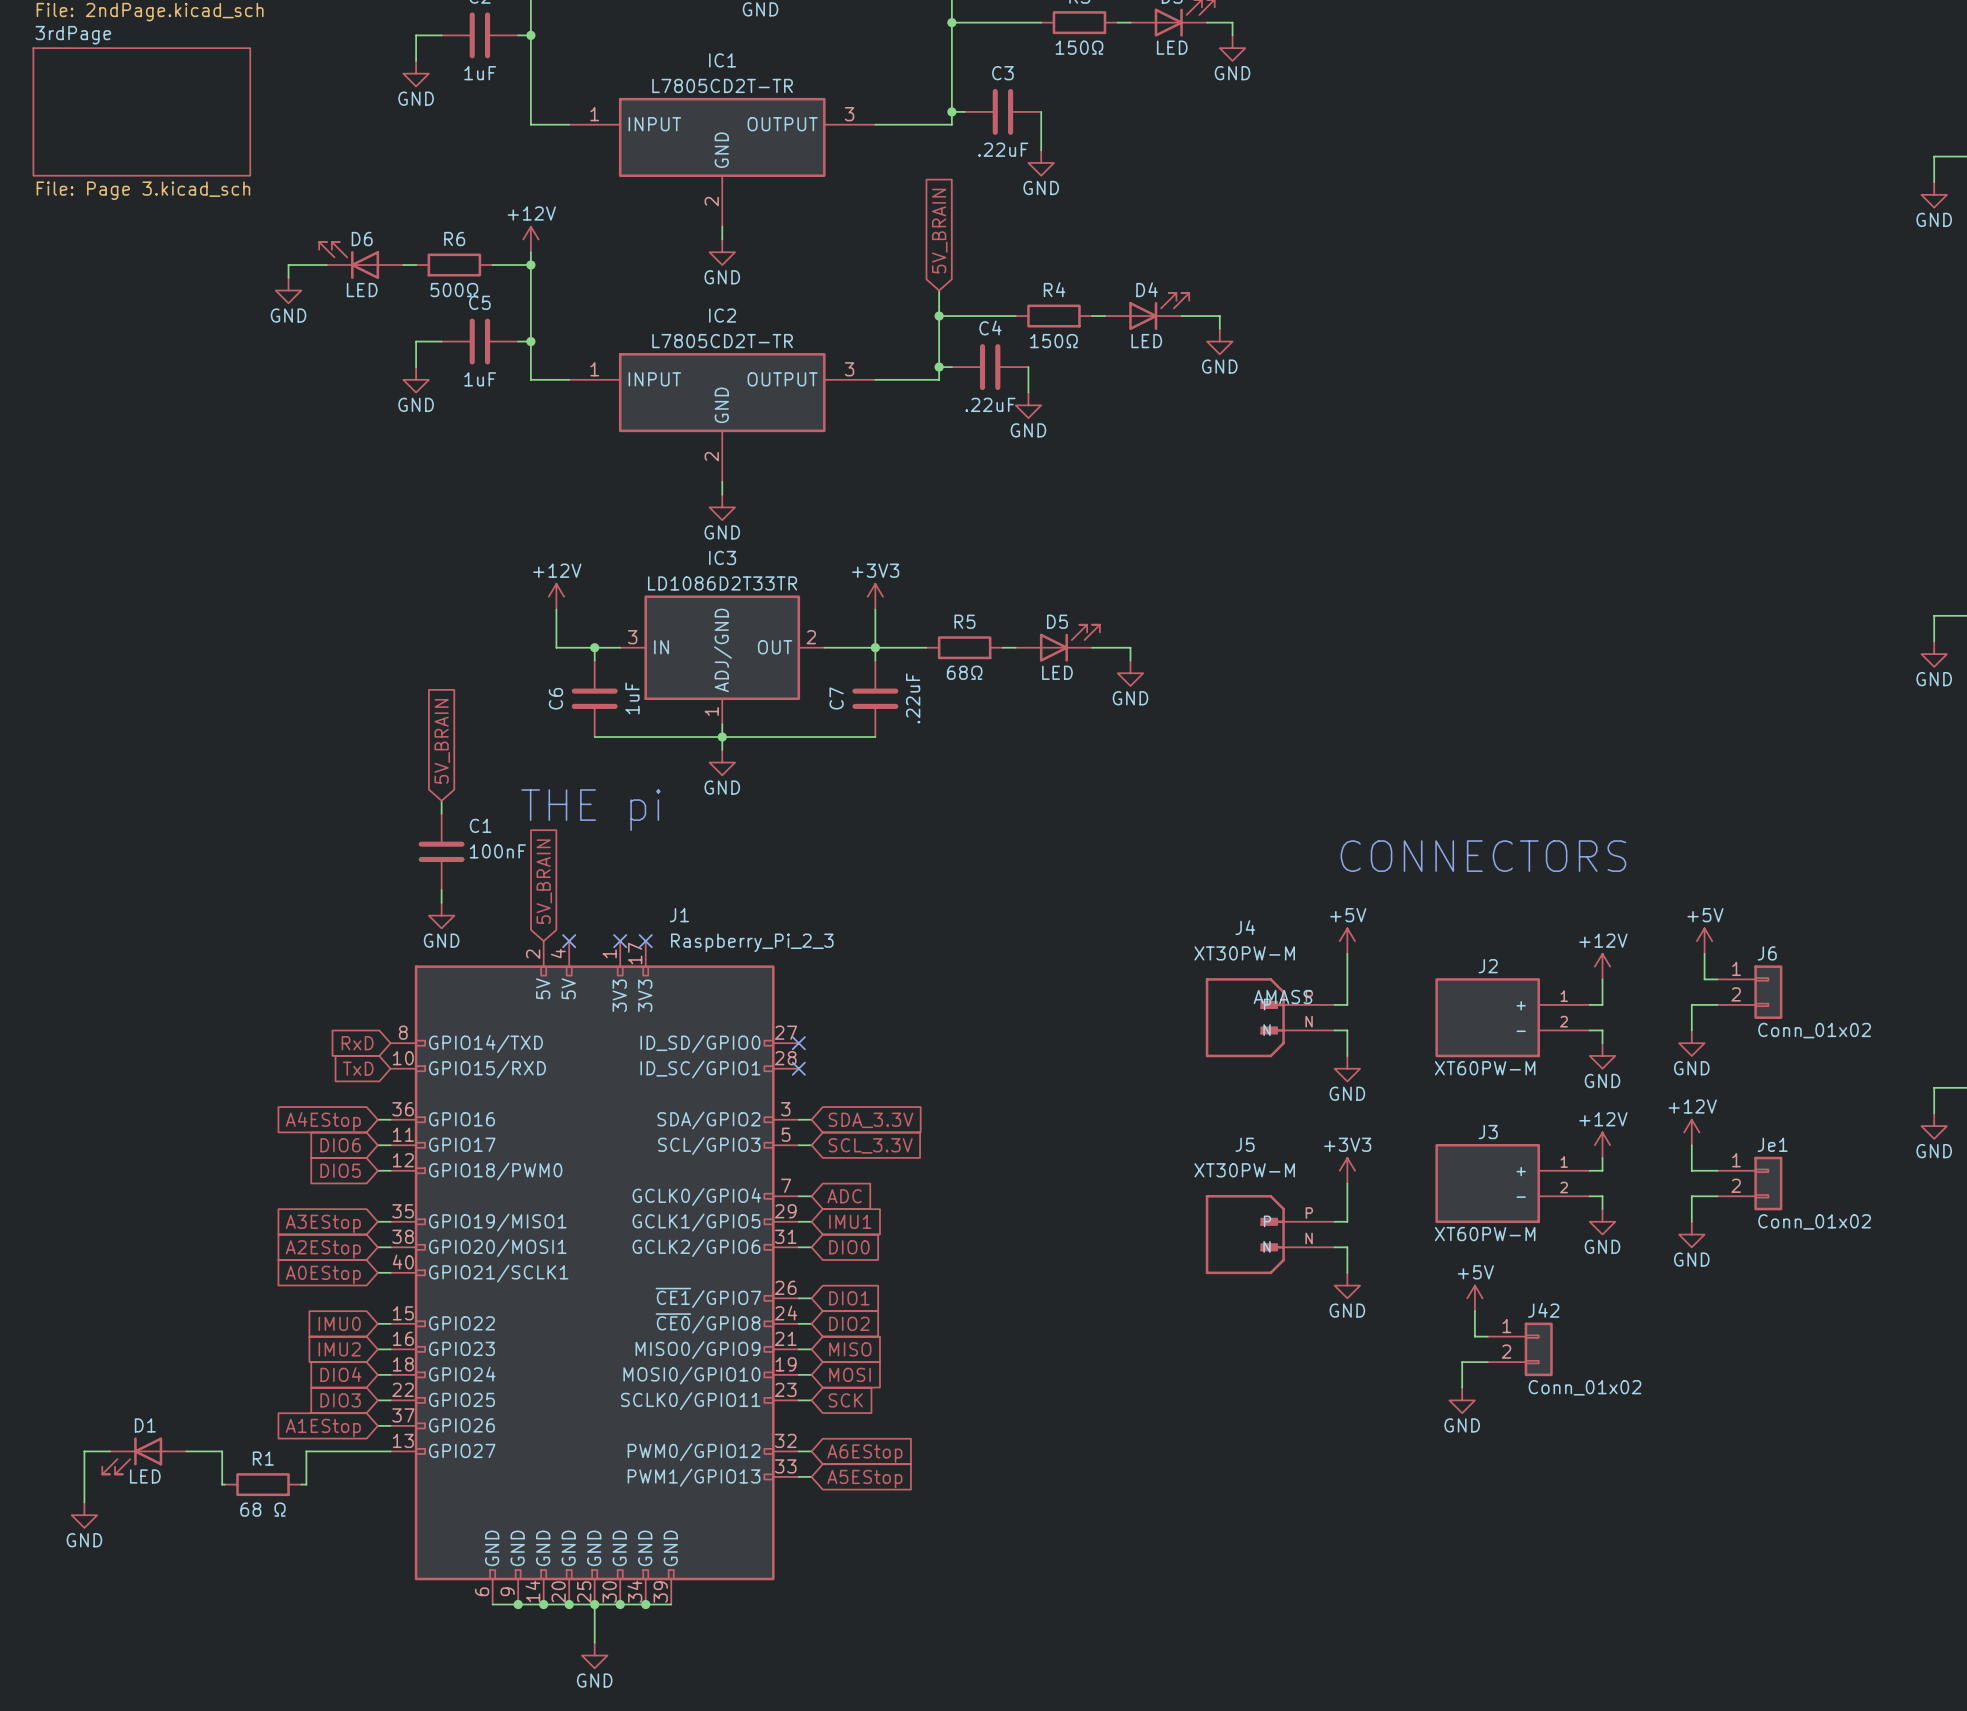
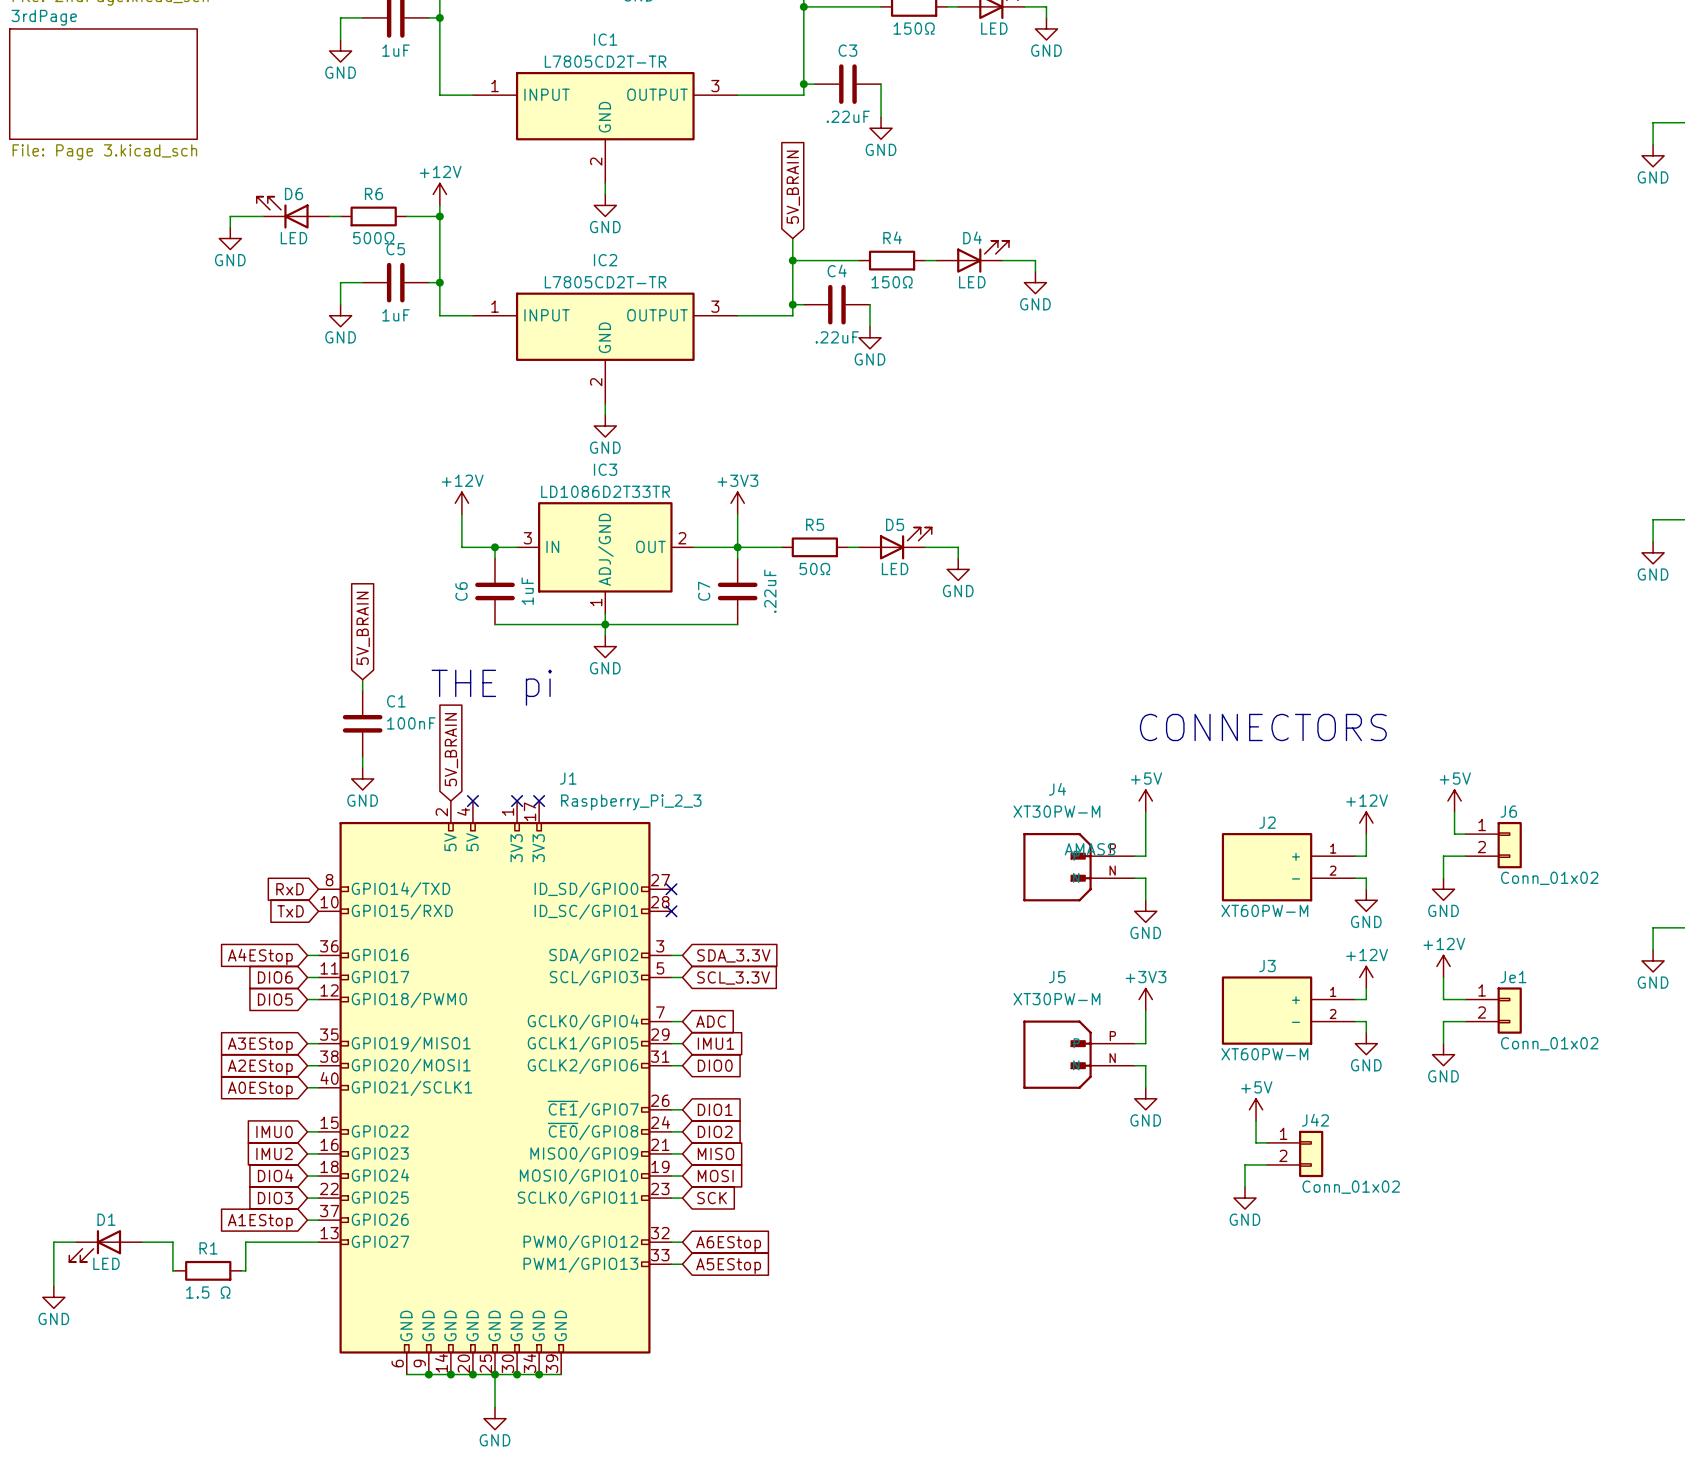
R5 value: 68Ω (964, 672) -> 50Ω (814, 568)
R1 value: 68 Ω (263, 1509) -> 1.5 Ω (208, 1292)

